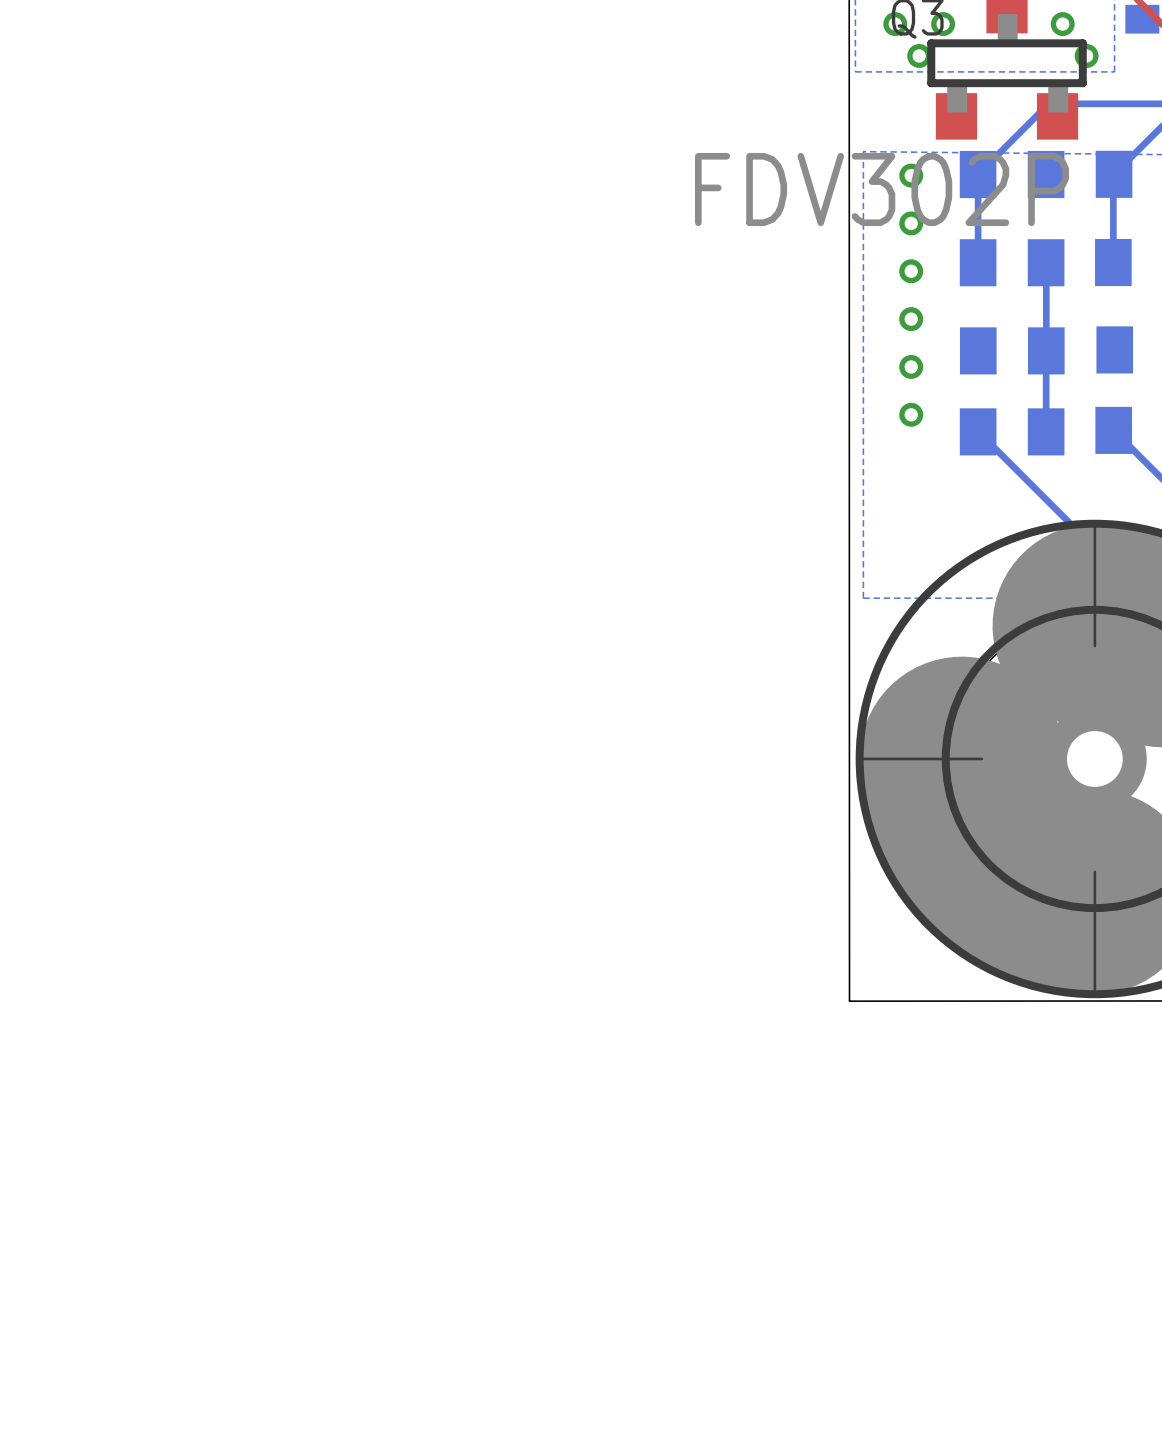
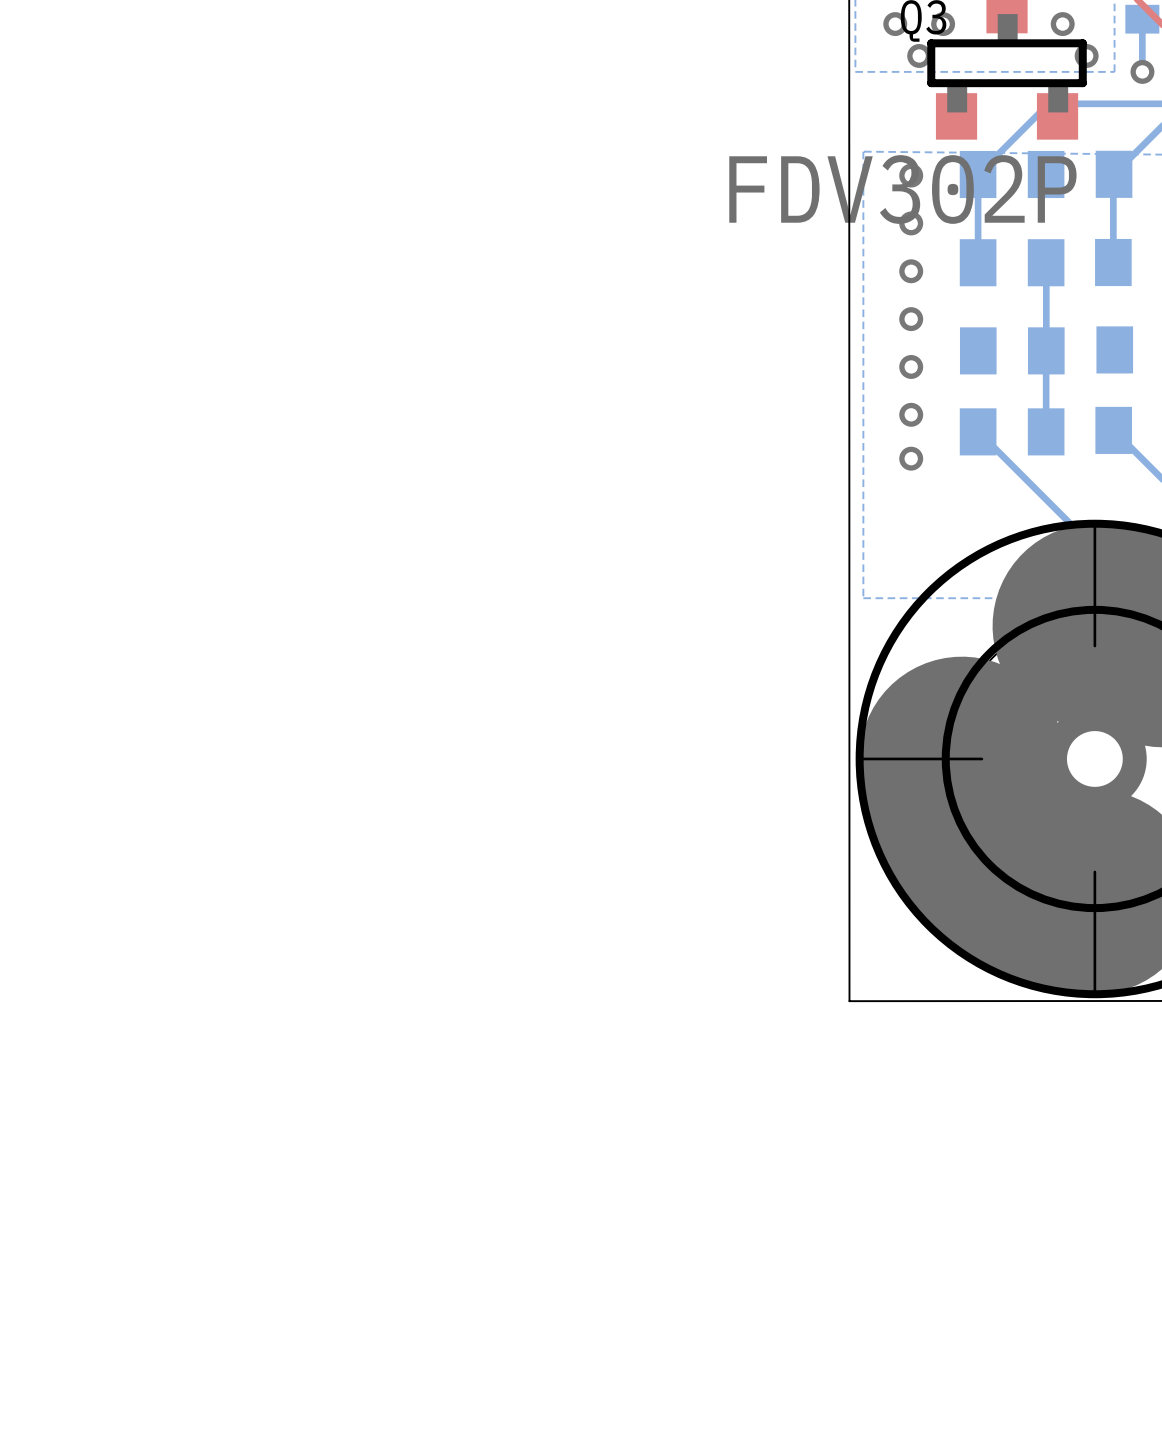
bottom track: none -> (1142, 19) (1142, 71)
via: none -> (1142, 71)
via: none -> (911, 458)

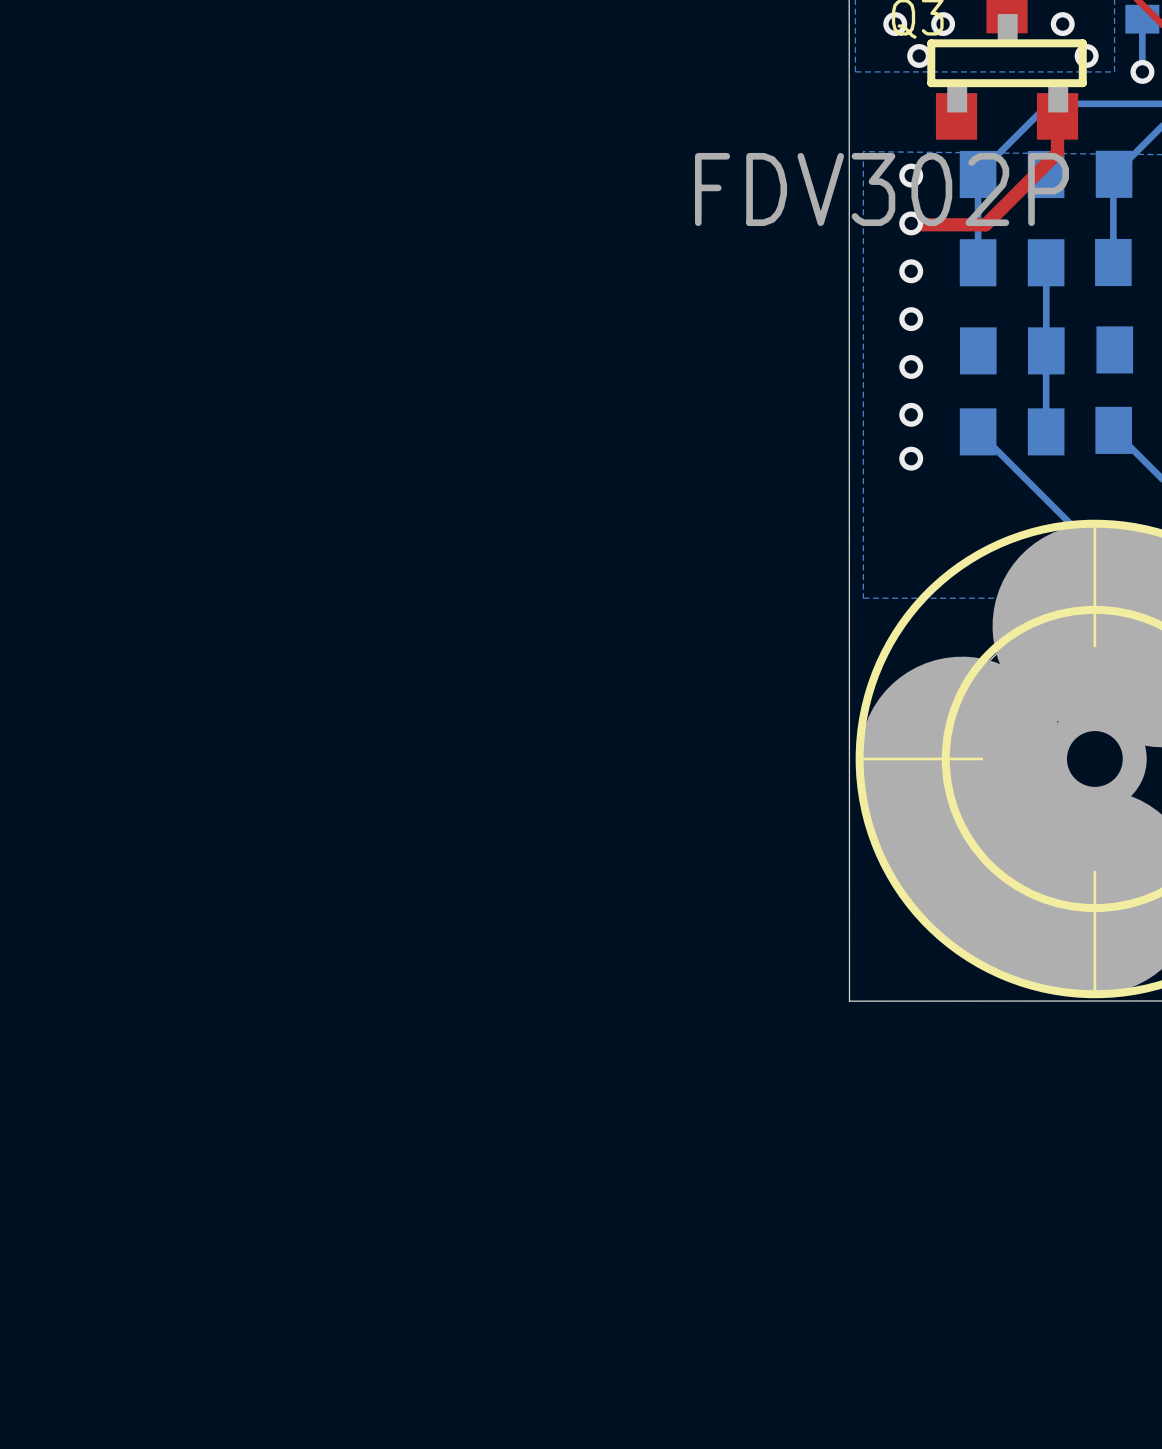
top track: none -> (1057, 116) (1057, 152) (985, 224) (911, 224)

